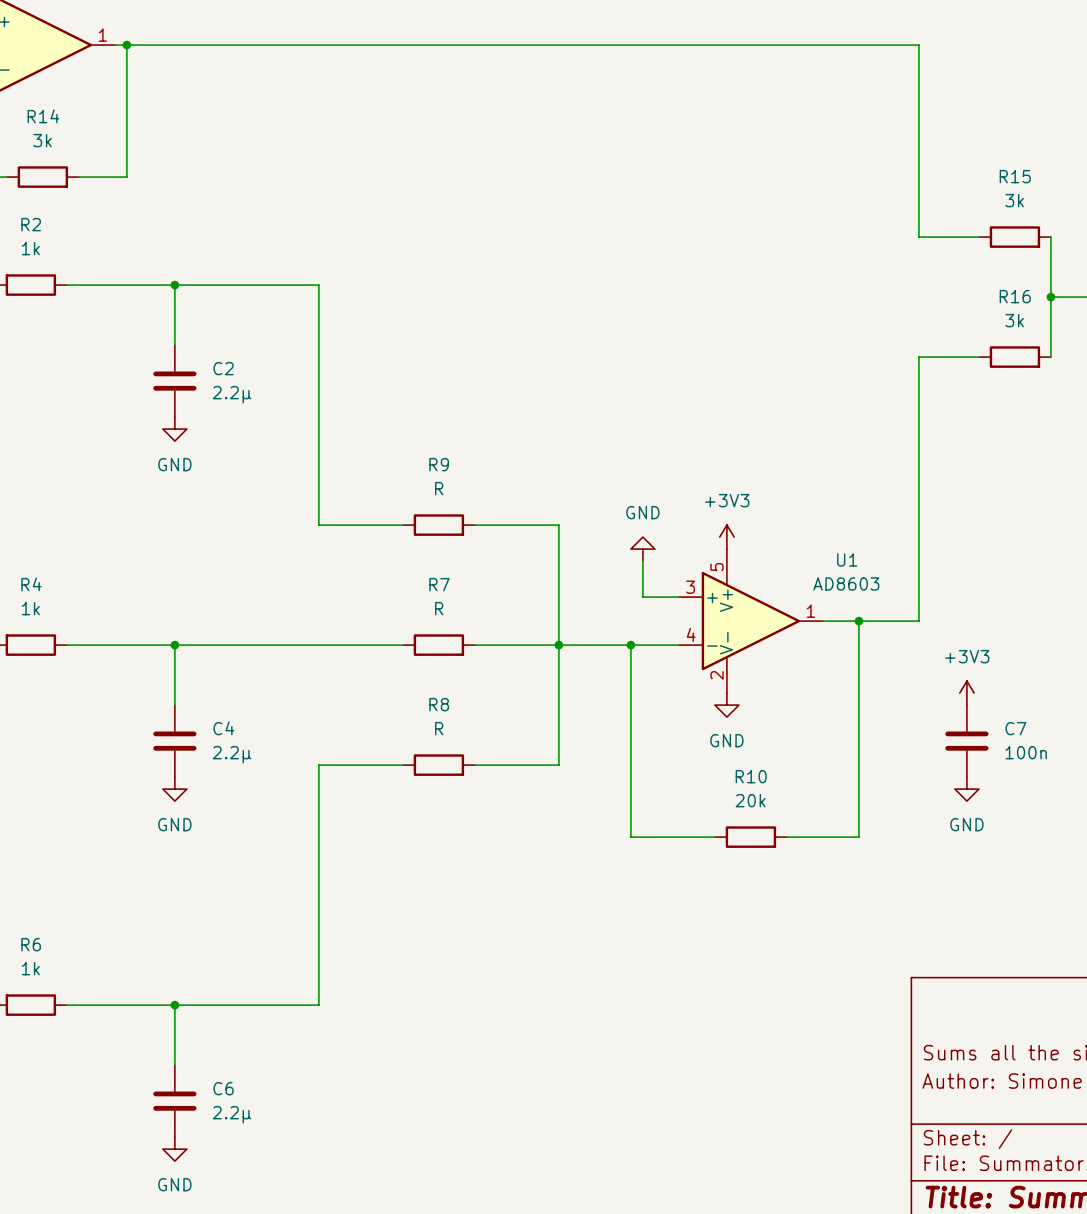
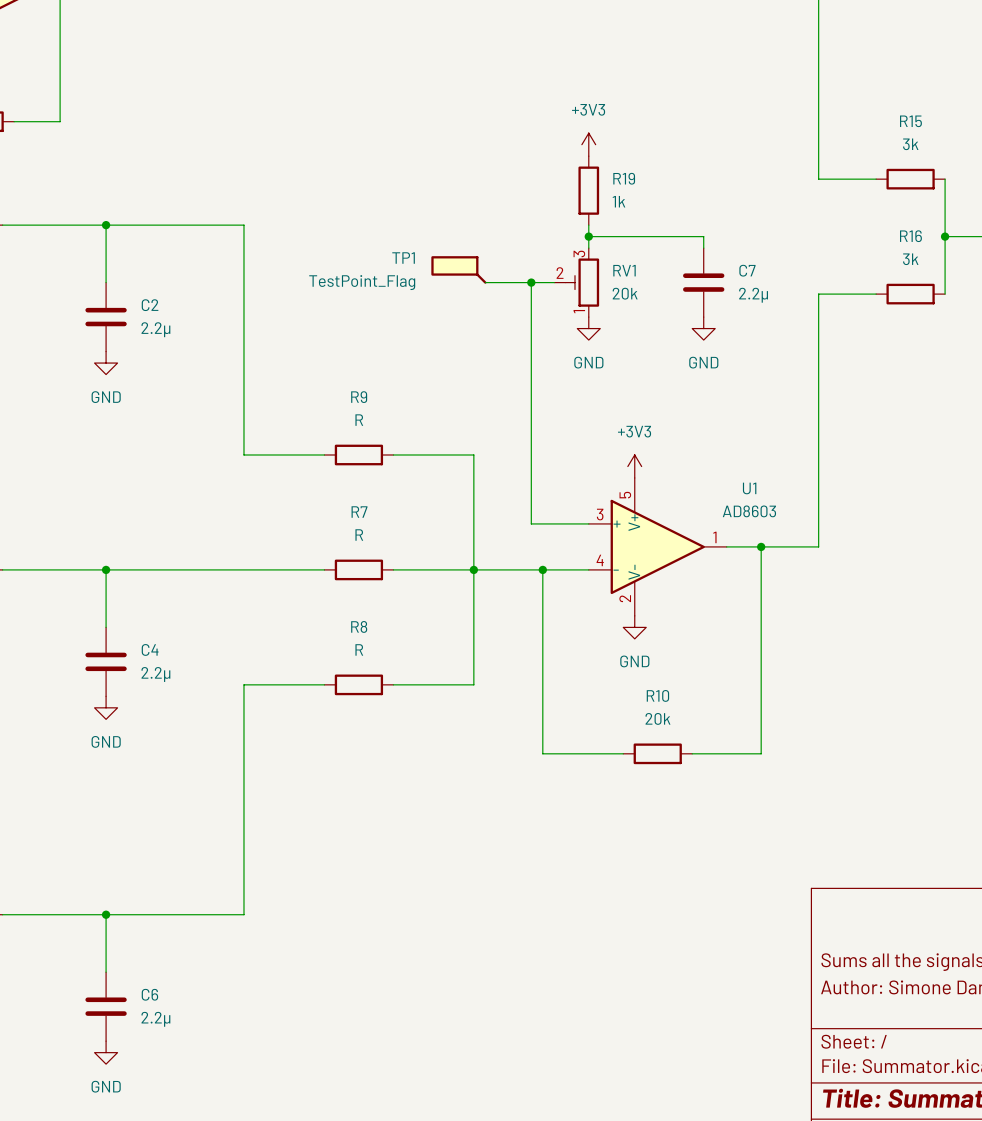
power symbol: none -> +3V3 (588, 144)
R19: none -> 1k (588, 190)
wire: none -> (588, 225) (588, 248)
wire: none -> (588, 236) (703, 236) (703, 248)
junction: none -> (588, 236)
TP1: none -> TestPoint_Flag (458, 269)
wire: none -> (485, 282) (554, 282)
junction: none -> (531, 282)
RV1: none -> 20k (576, 282)
power symbol: none -> GND (588, 328)
power symbol: none -> GND (703, 328)
power symbol: GND (642, 549) -> none
wire: (642, 561) (642, 597) -> (531, 282) (531, 523) (554, 523)
power symbol: +3V3 (966, 693) -> none
C7 position: (966, 741) -> (703, 282)
C7 value: 100n (1026, 752) -> 2.2µ (753, 295)
power symbol: GND (966, 789) -> none

